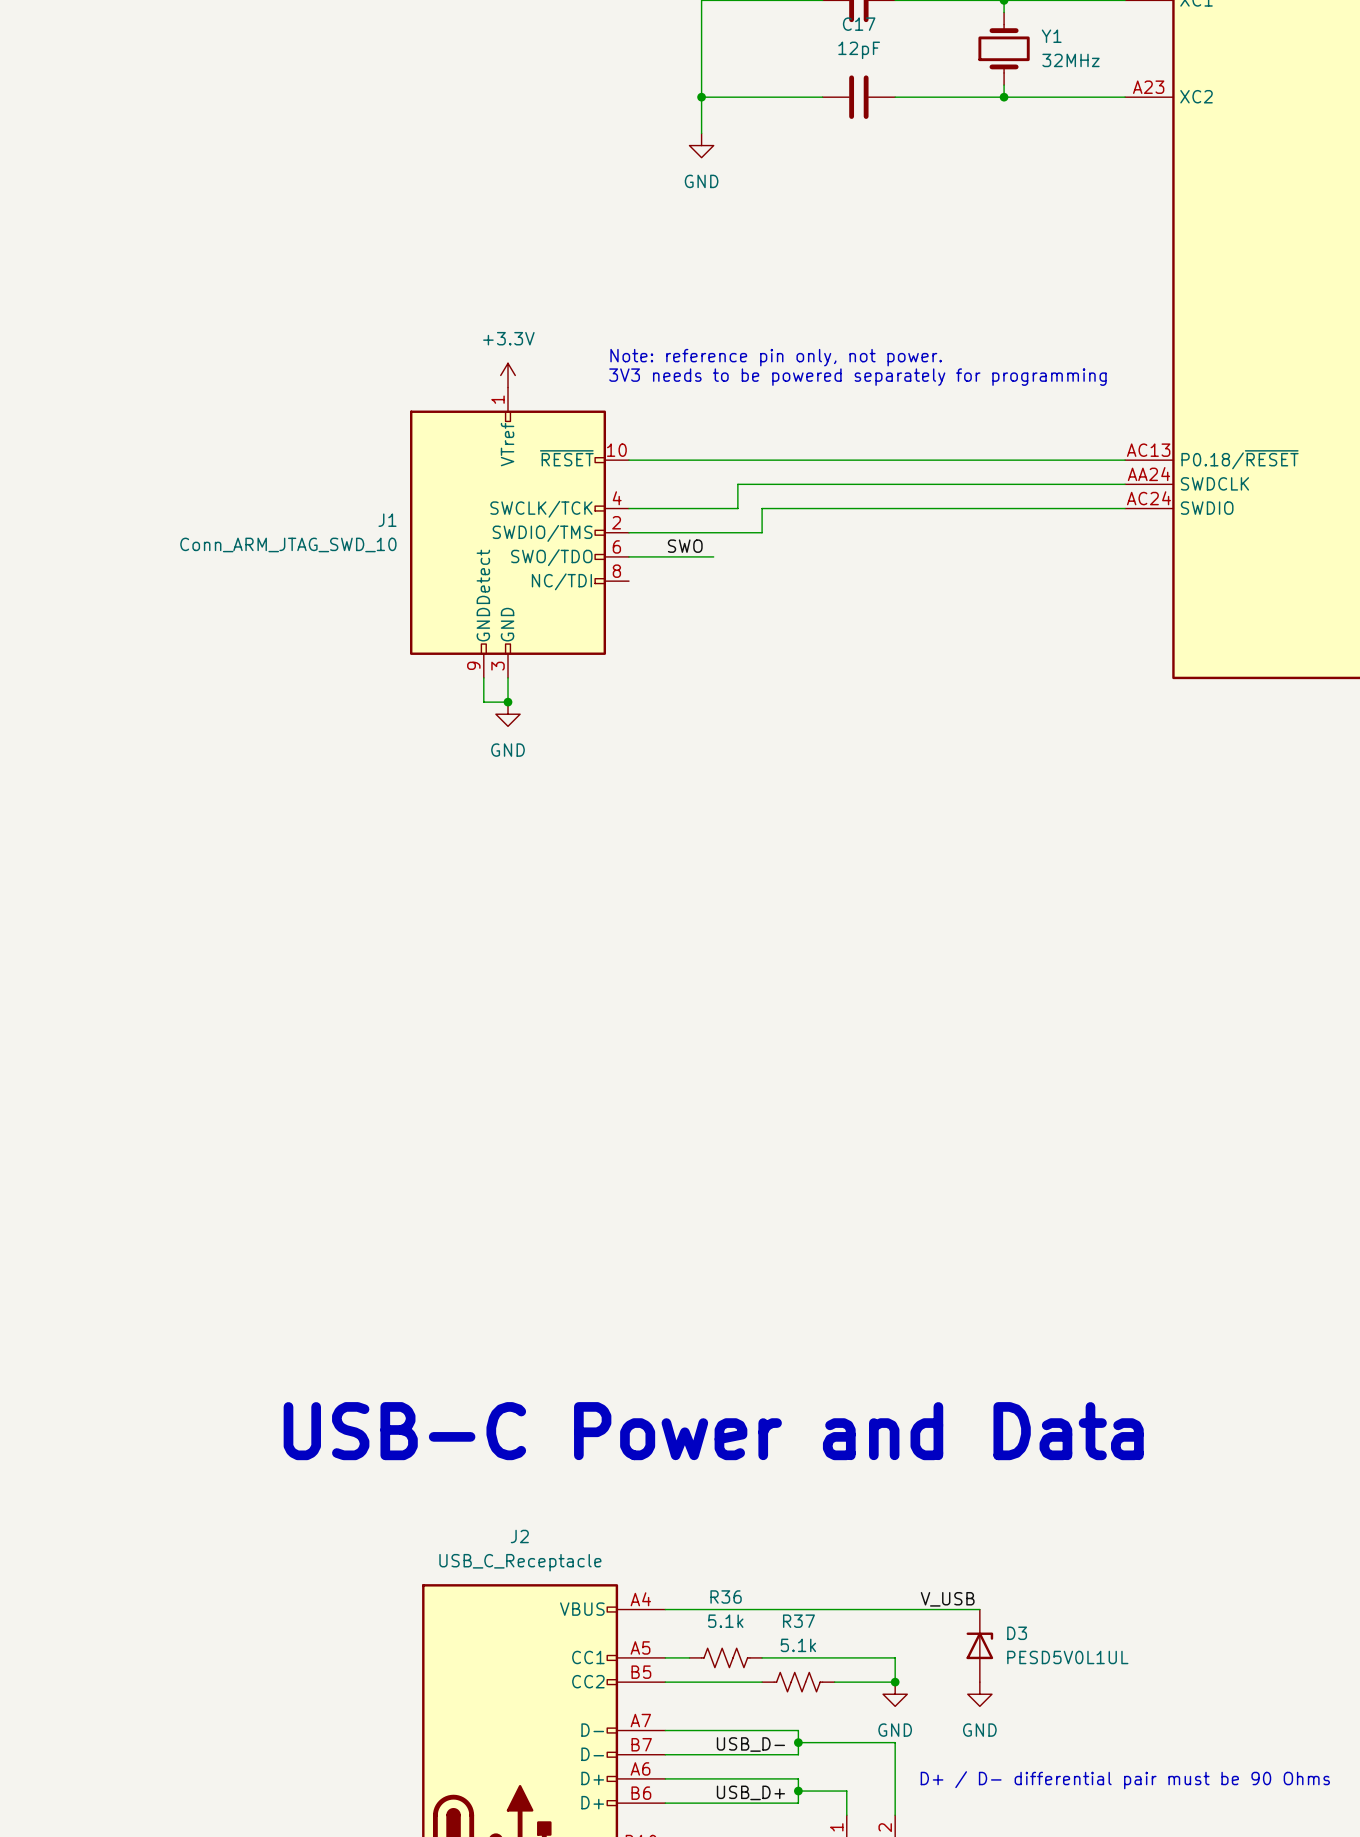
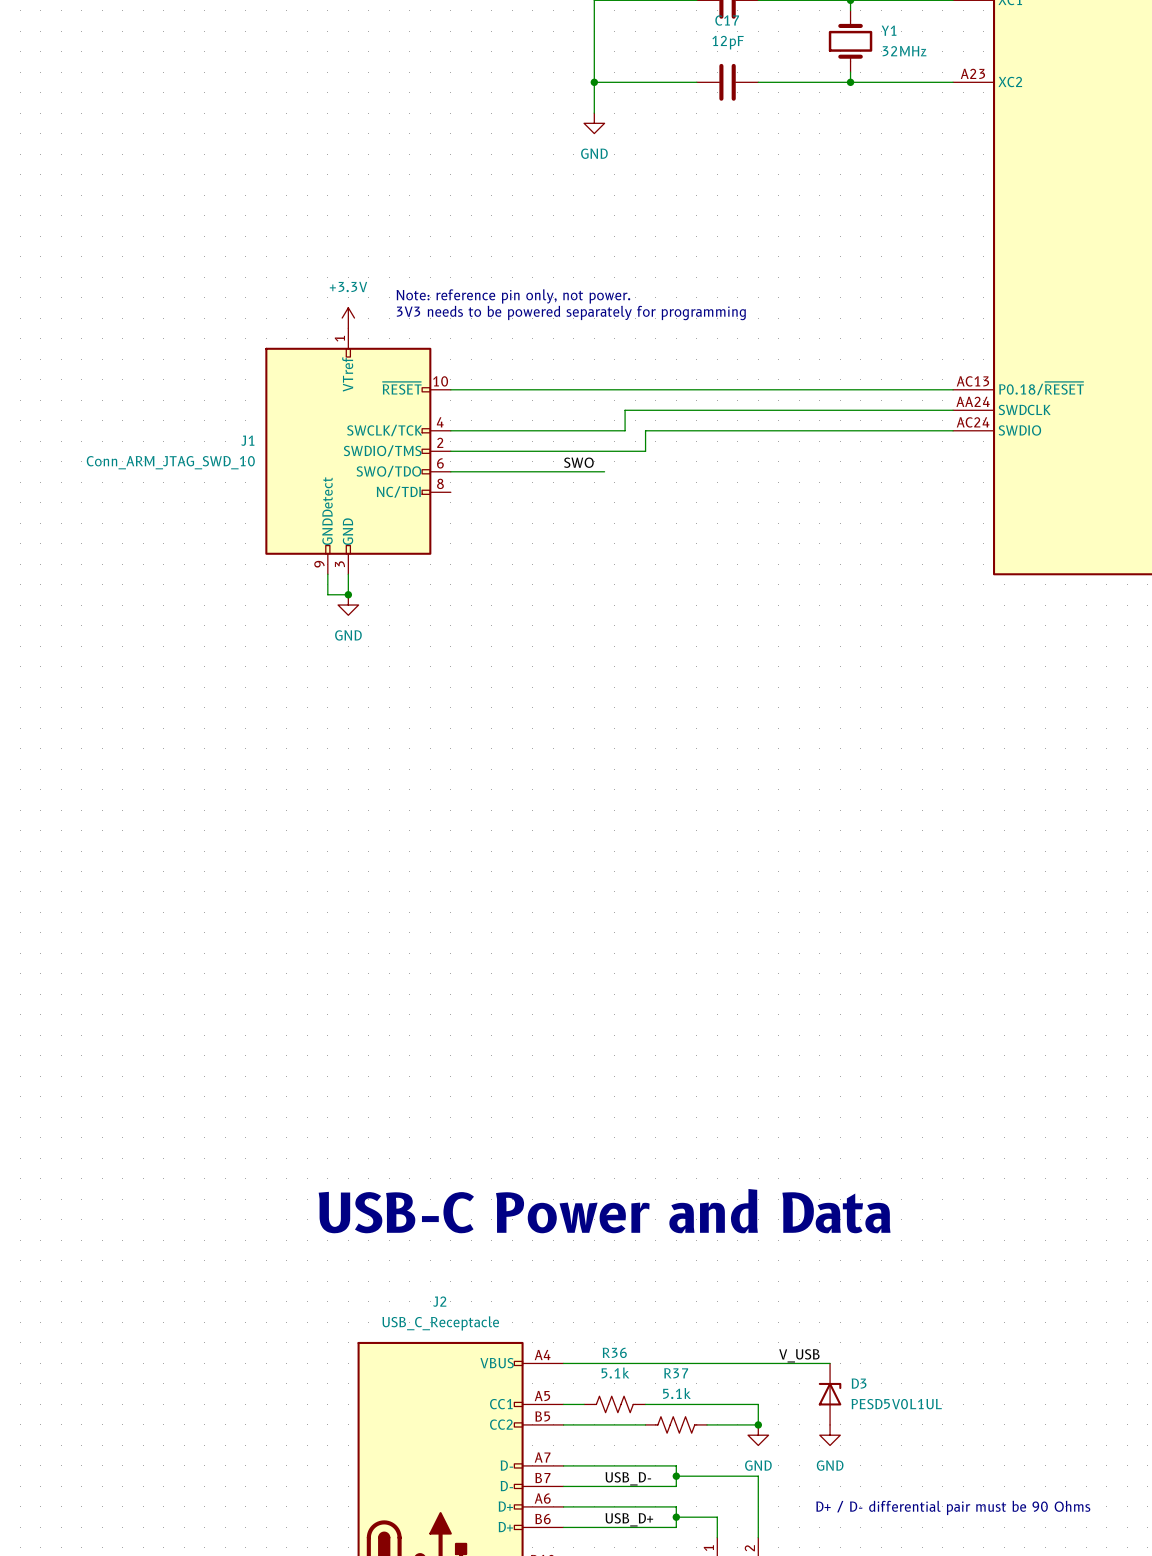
text position: Note: reference pin only, not power. (776, 357) -> Note: reference pin only, not power. (513, 296)
power symbol position: +3.3V (508, 375) -> +3.3V (348, 318)
text position: 3V3 needs to be powered separately for programming (857, 377) -> 3V3 needs to be powered separately for programming (571, 313)
J1 position: (519, 532) -> (358, 451)
wire: (483, 677) (483, 702) (508, 702) (508, 677) -> (327, 574) (327, 594) (348, 594) (348, 574)
junction: none -> (348, 594)
junction: (508, 702) -> none
power symbol position: GND (508, 714) -> GND (348, 605)

